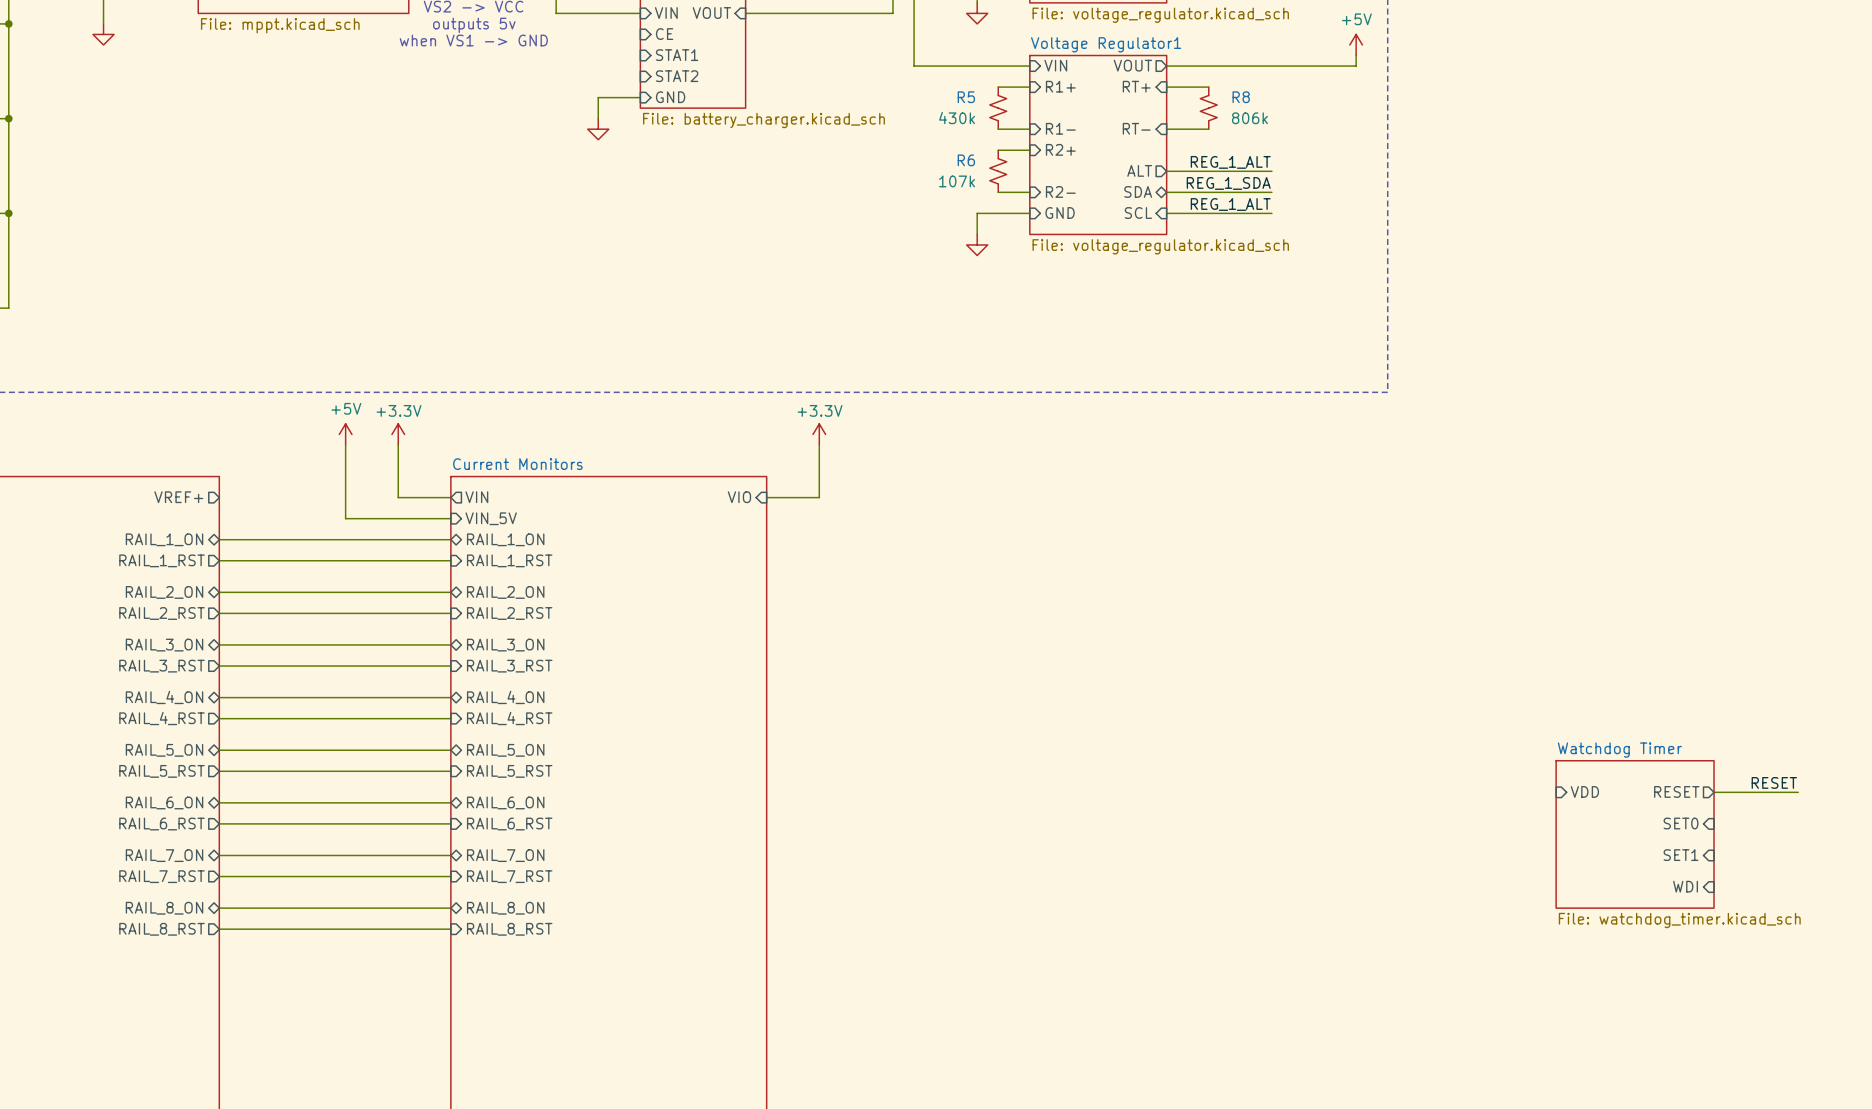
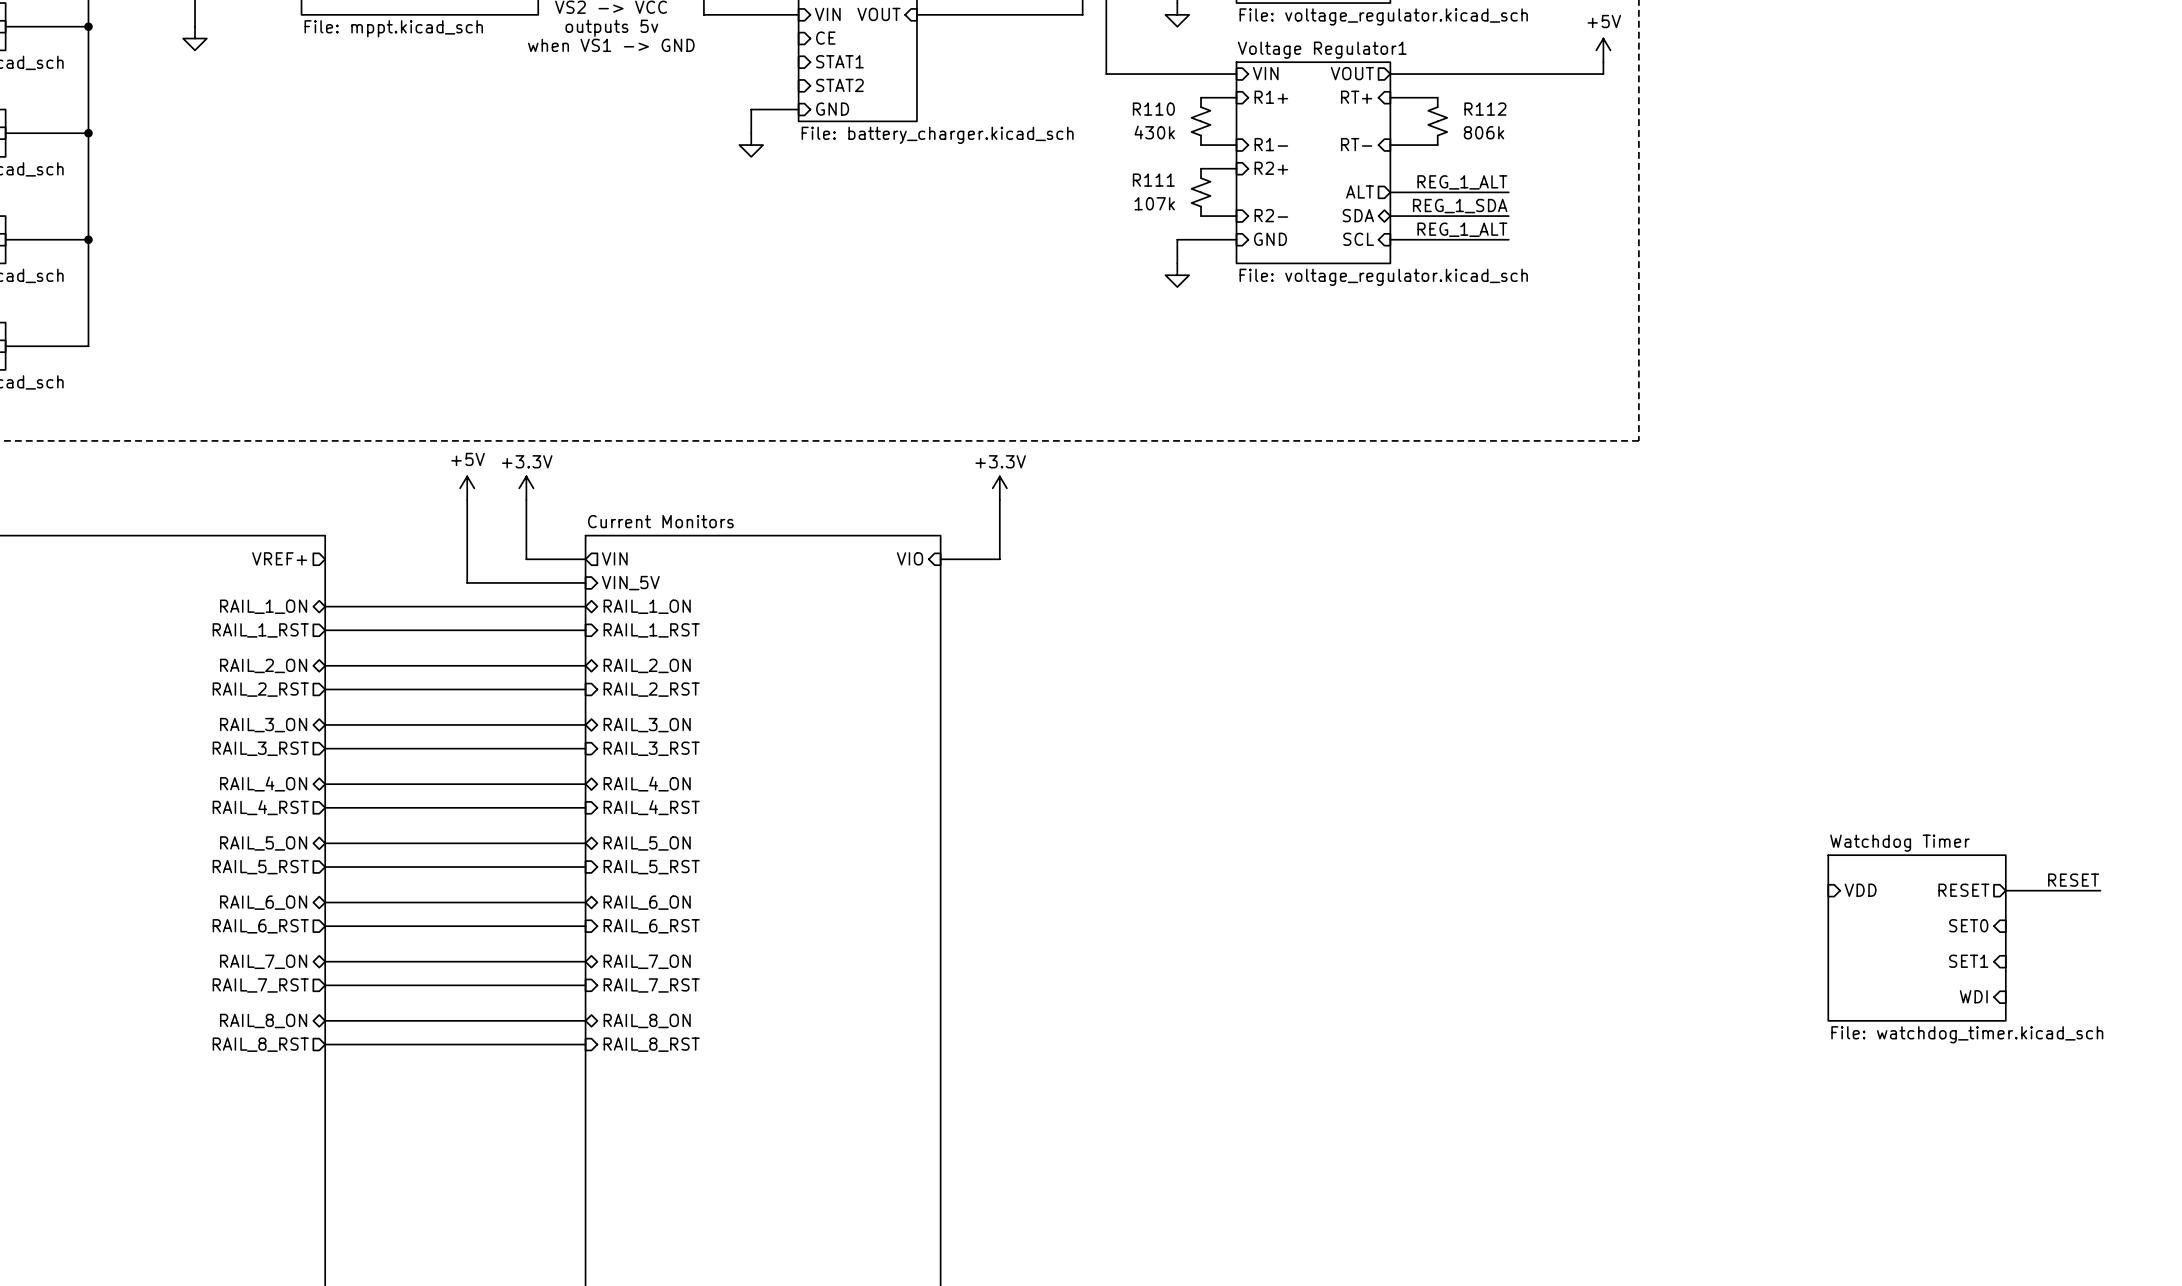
R5 name: R5 (966, 97) -> R110 (1153, 109)
R8 name: R8 (1241, 97) -> R112 (1485, 109)
R6 name: R6 (966, 160) -> R111 (1153, 180)

